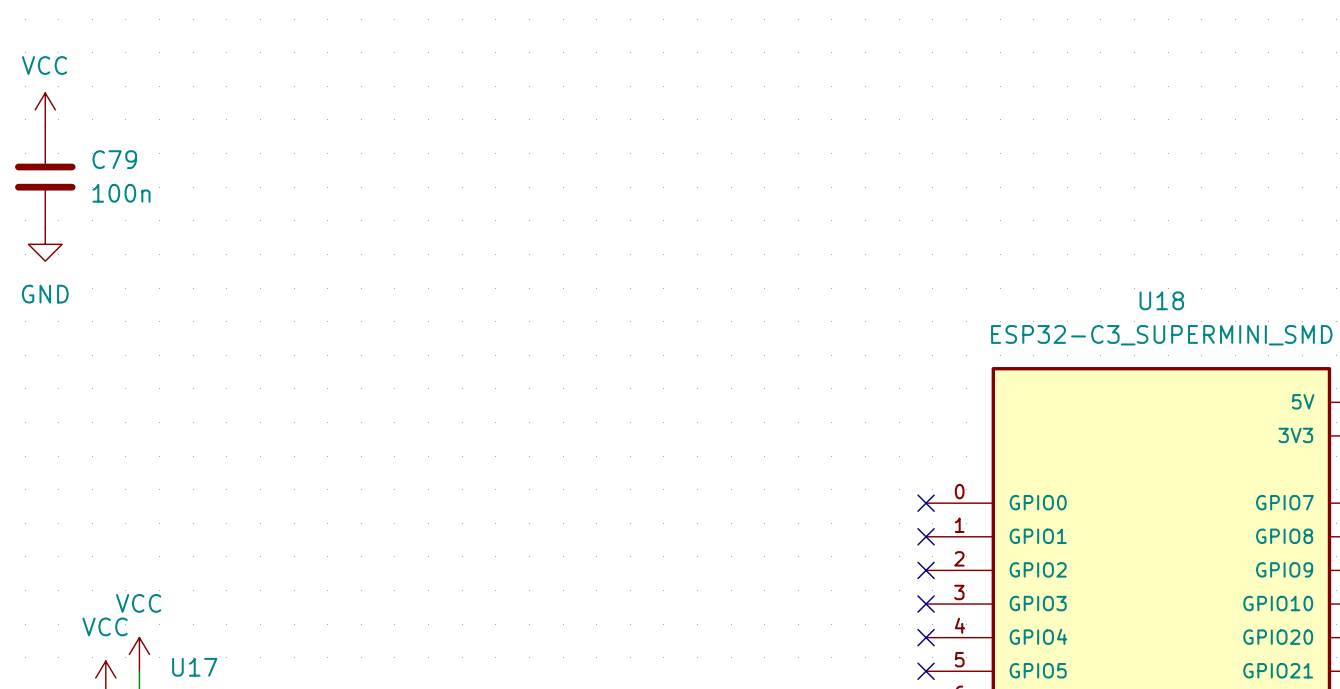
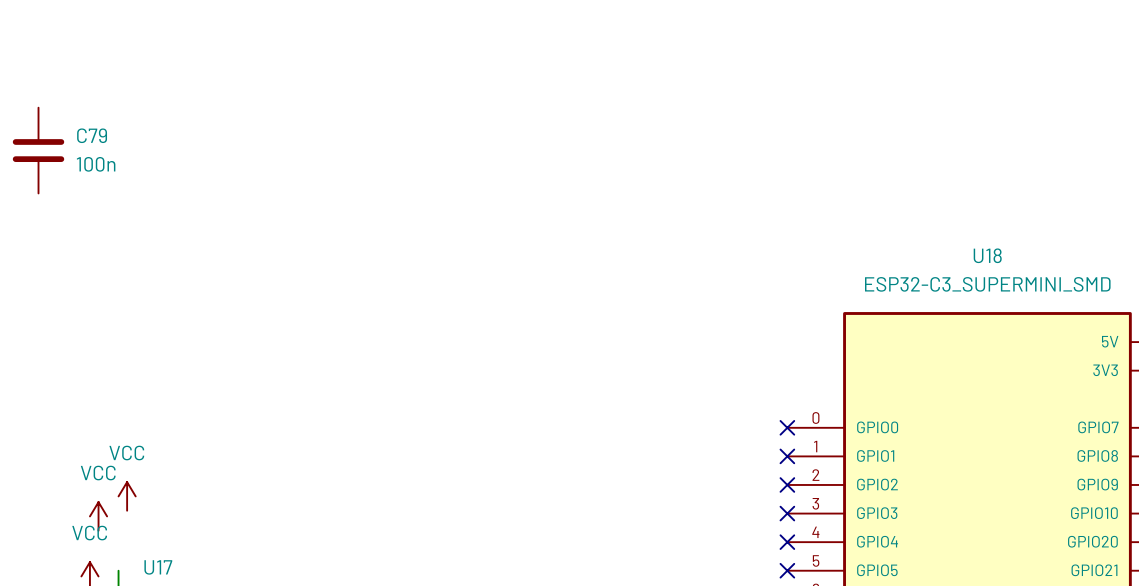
power symbol: VCC (45, 109) -> none
power symbol: GND (45, 244) -> none
power symbol: none -> VCC (127, 496)
power symbol: none -> VCC (98, 516)
power symbol: VCC (139, 654) -> none

